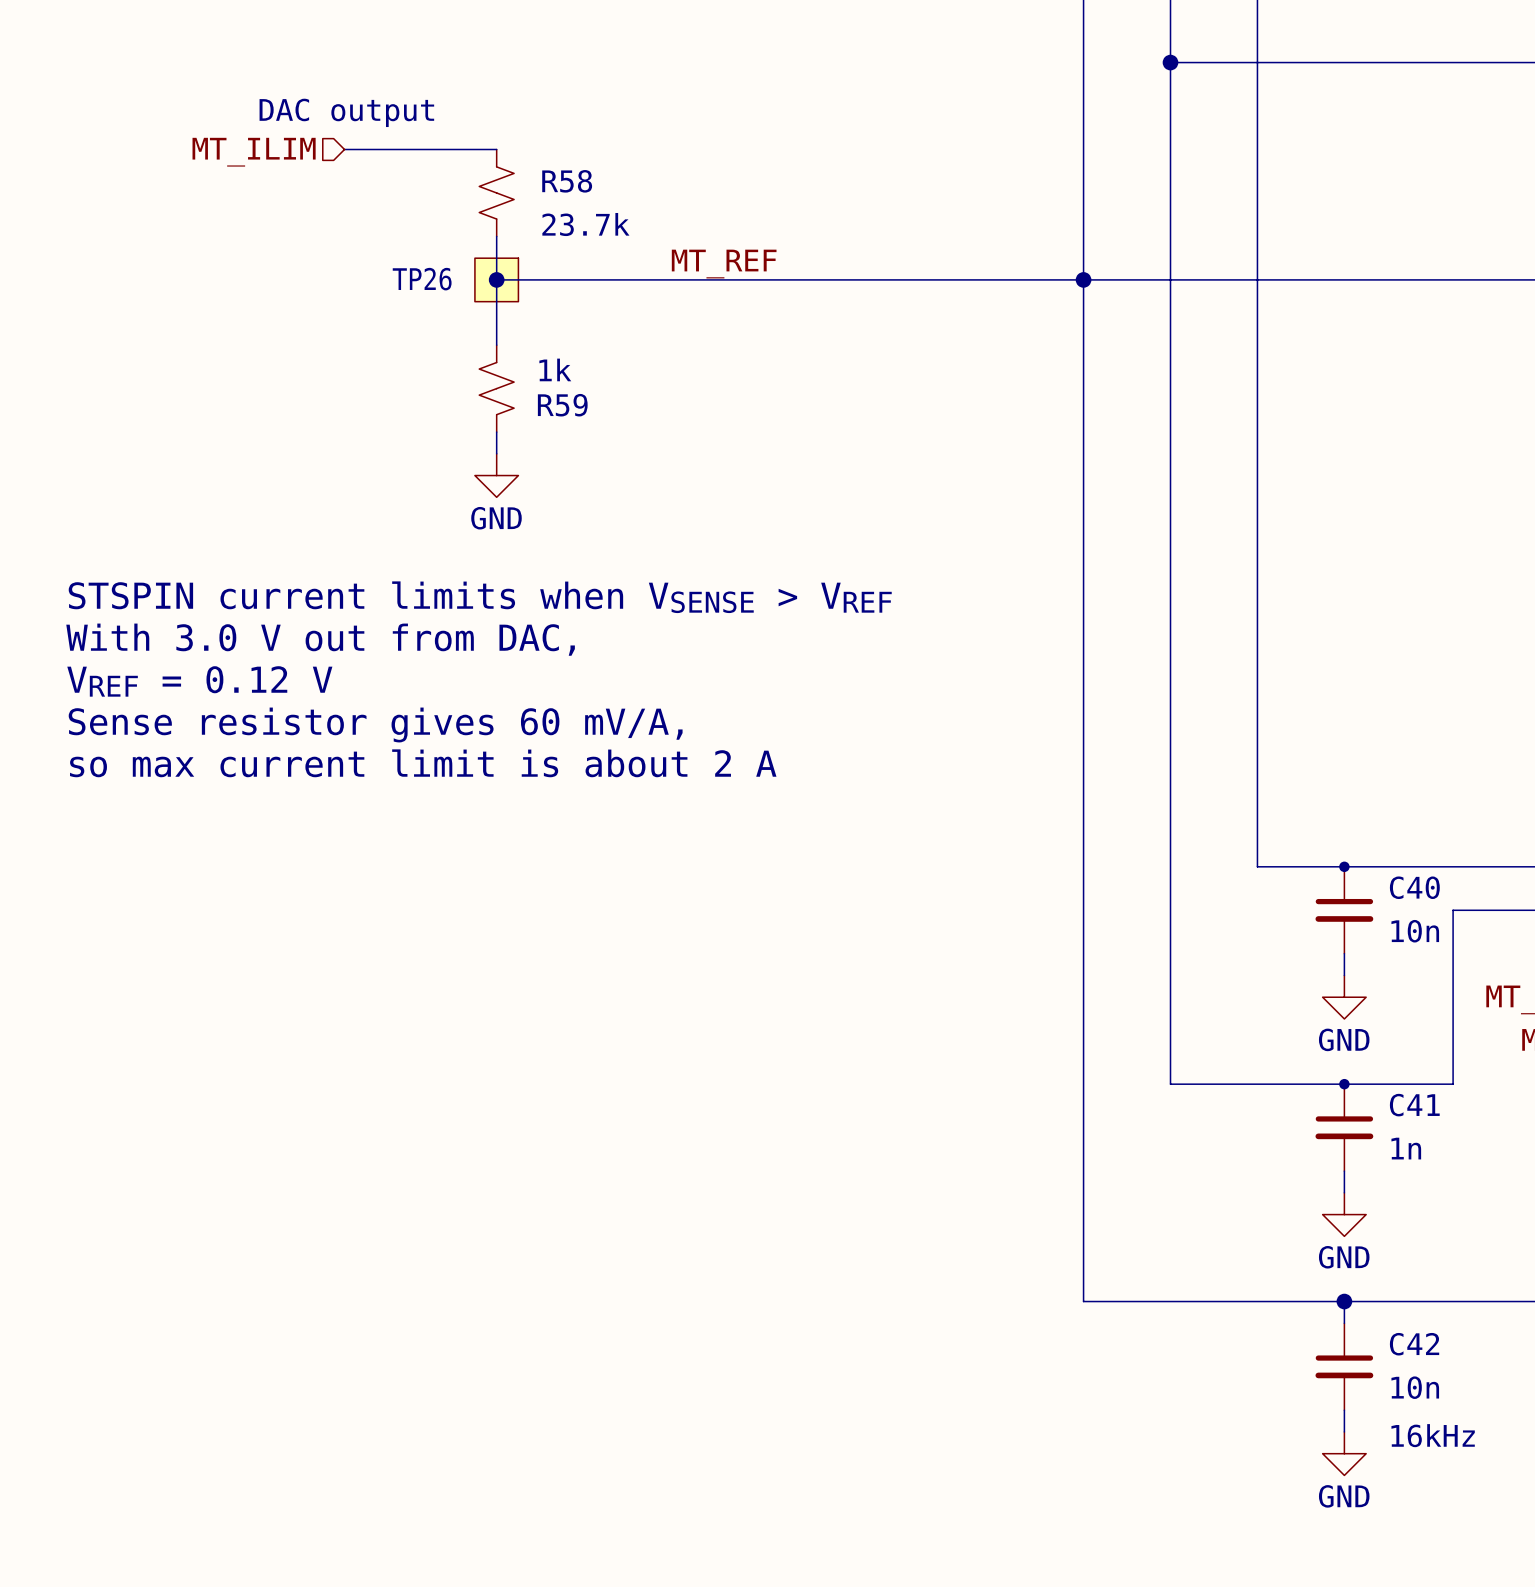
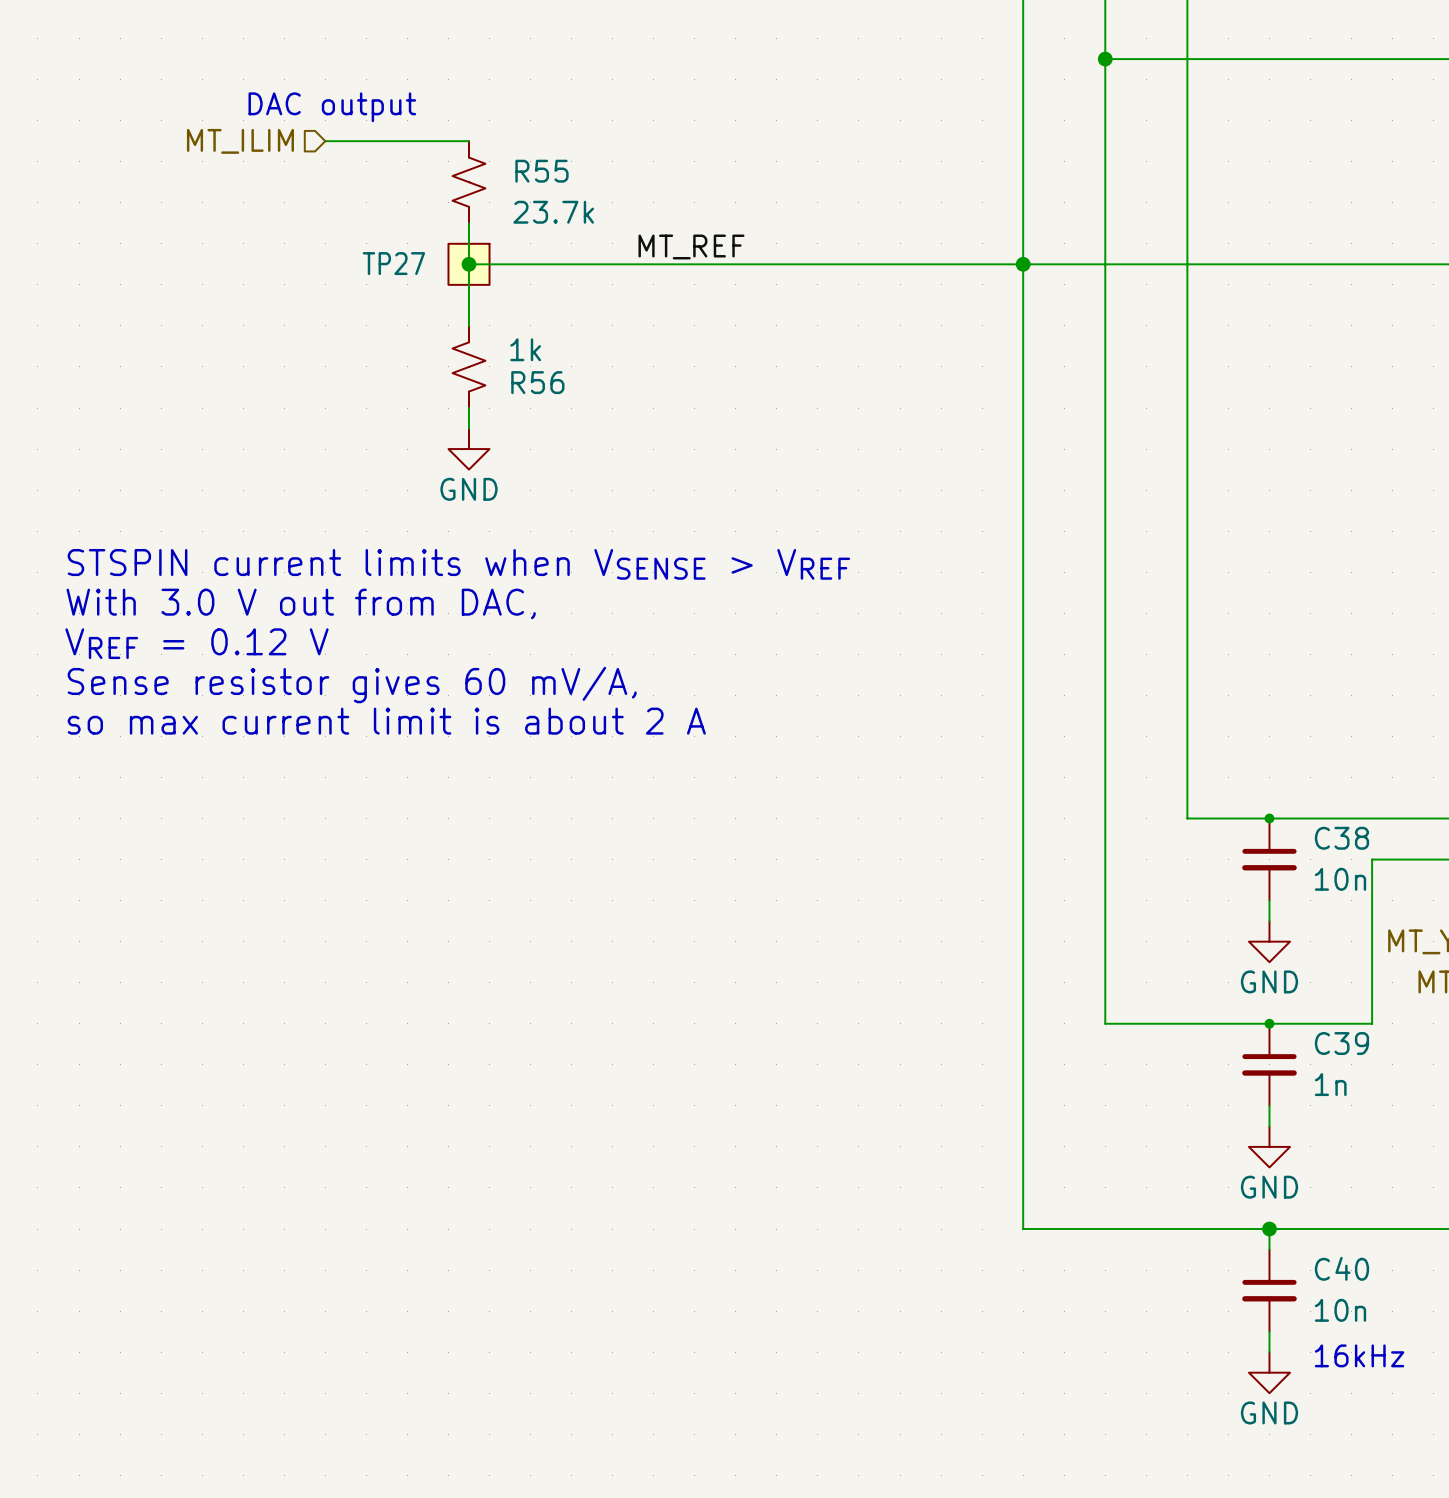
R58 name: R58 (567, 181) -> R55 (541, 171)
TP26 name: TP26 (422, 279) -> TP27 (393, 263)
R59 name: R59 (562, 405) -> R56 (537, 382)
C40 name: C40 (1414, 887) -> C38 (1341, 838)
C41 name: C41 (1414, 1105) -> C39 (1341, 1043)
C42 name: C42 (1414, 1344) -> C40 (1341, 1268)

